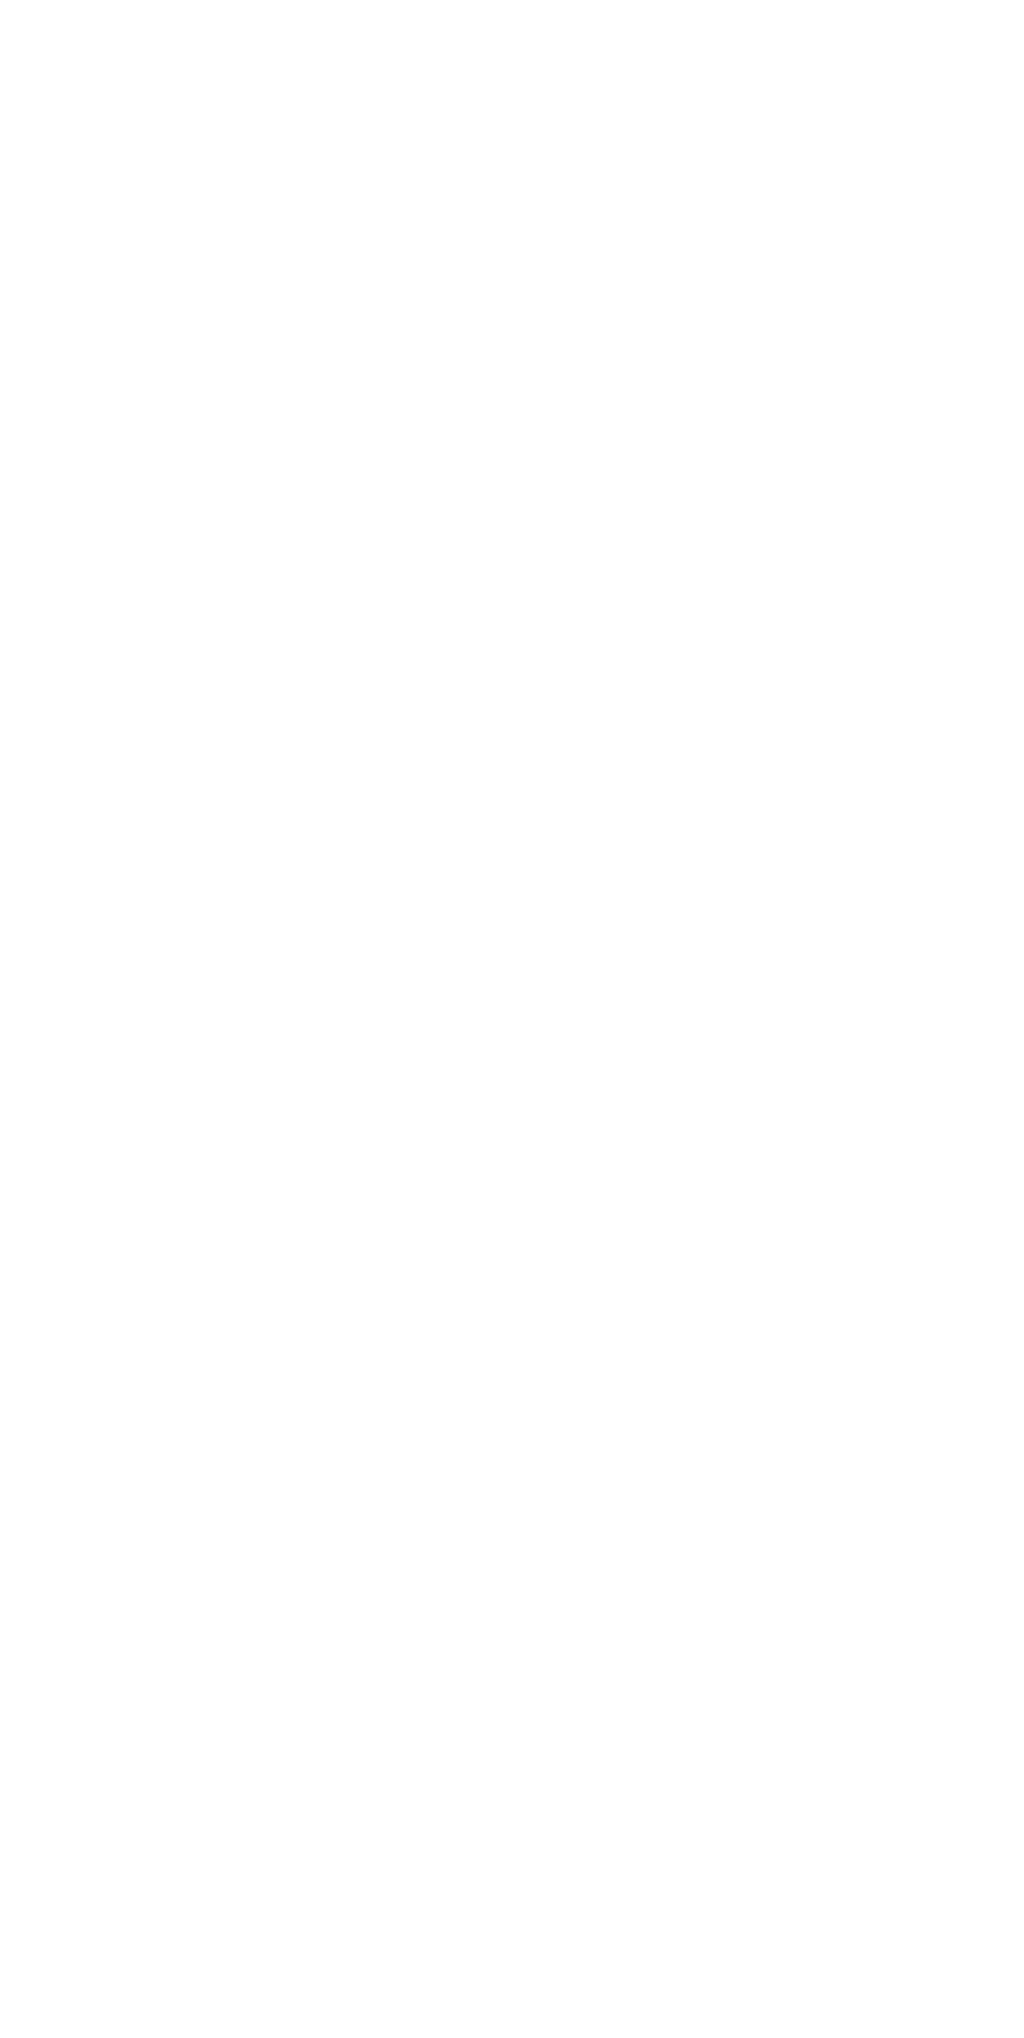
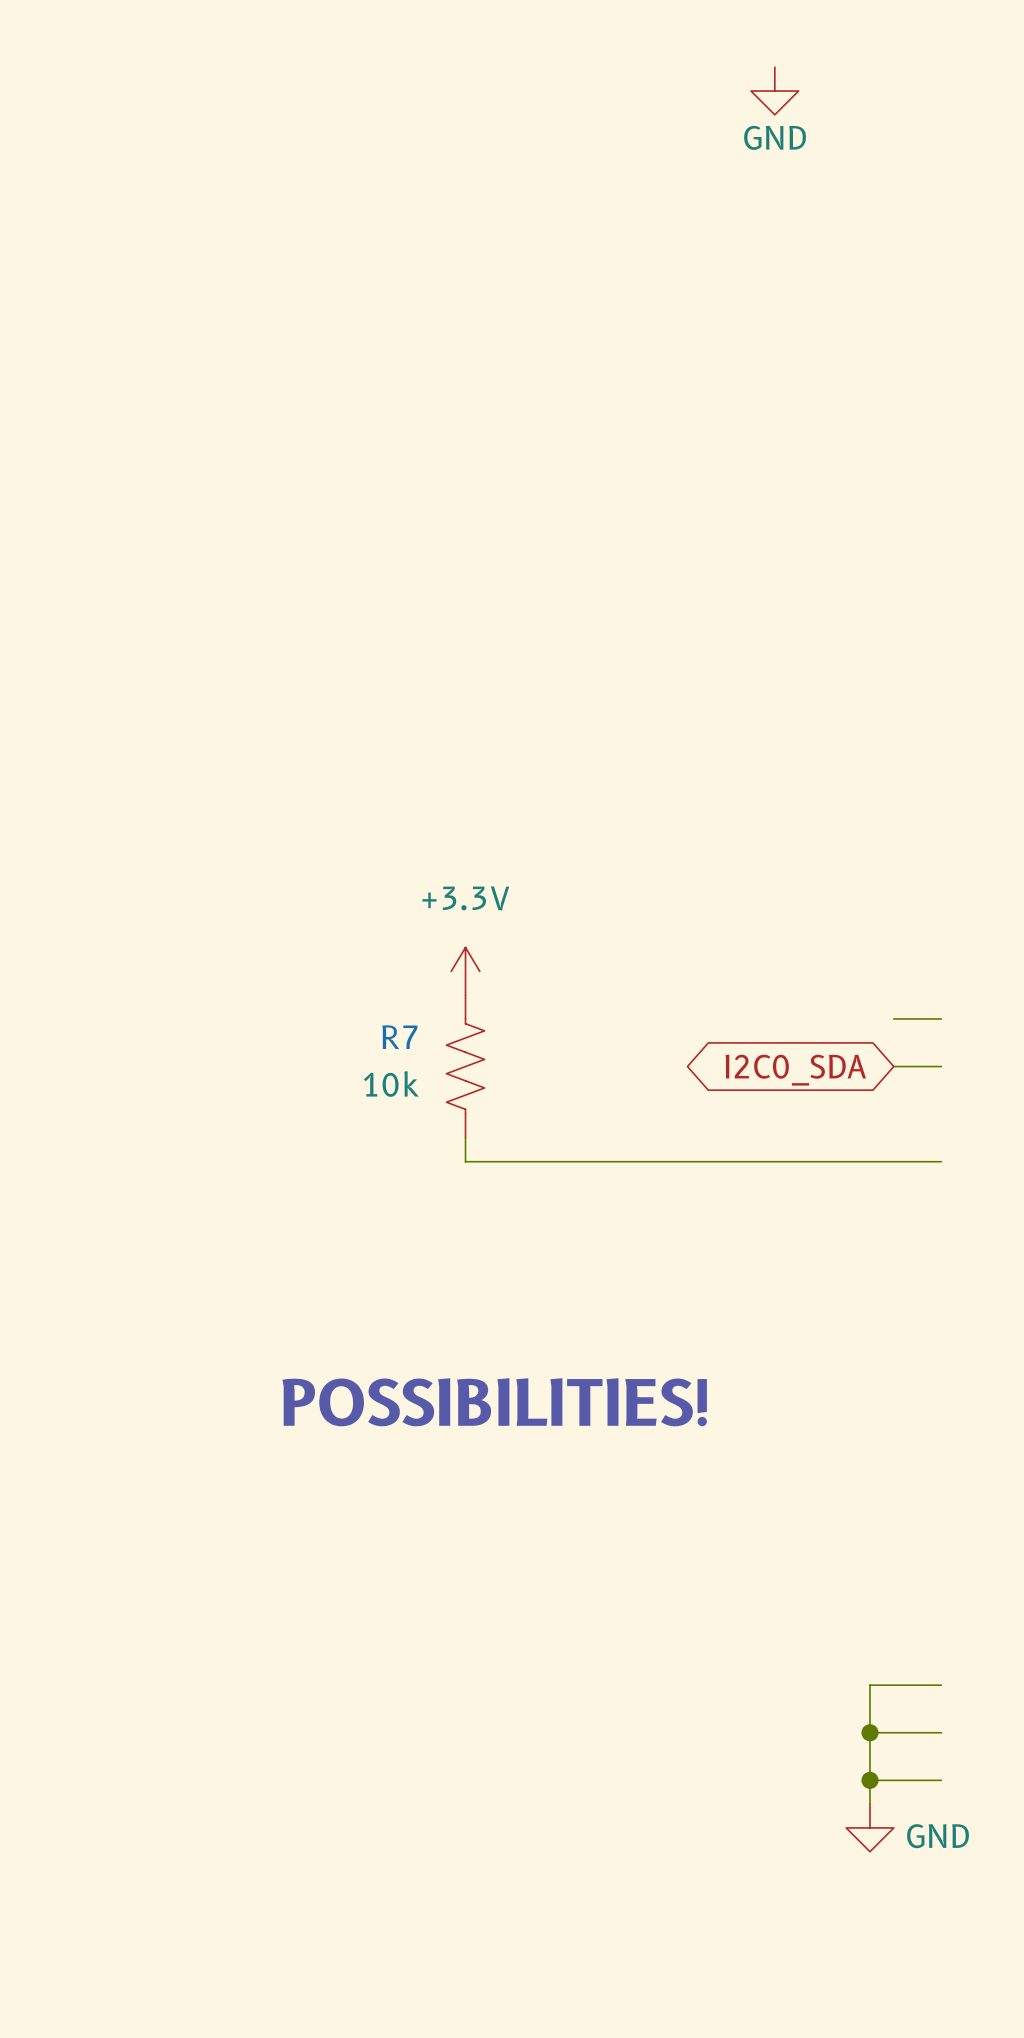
power symbol: none -> GND (774, 91)
power symbol: none -> +3.3V (465, 971)
wire: none -> (893, 1018) (941, 1018)
R7: none -> 10k (465, 1066)
wire: none -> (893, 1066) (941, 1066)
global label: none -> I2C0_SDA (795, 1070)
wire: none -> (465, 1137) (465, 1161) (941, 1161)
text: none -> POSSIBILITIES! (494, 1402)
wire: none -> (941, 1685) (869, 1685) (869, 1804)
wire: none -> (869, 1732) (941, 1732)
junction: none -> (869, 1732)
wire: none -> (869, 1780) (941, 1780)
junction: none -> (869, 1780)
power symbol: none -> GND (869, 1827)

